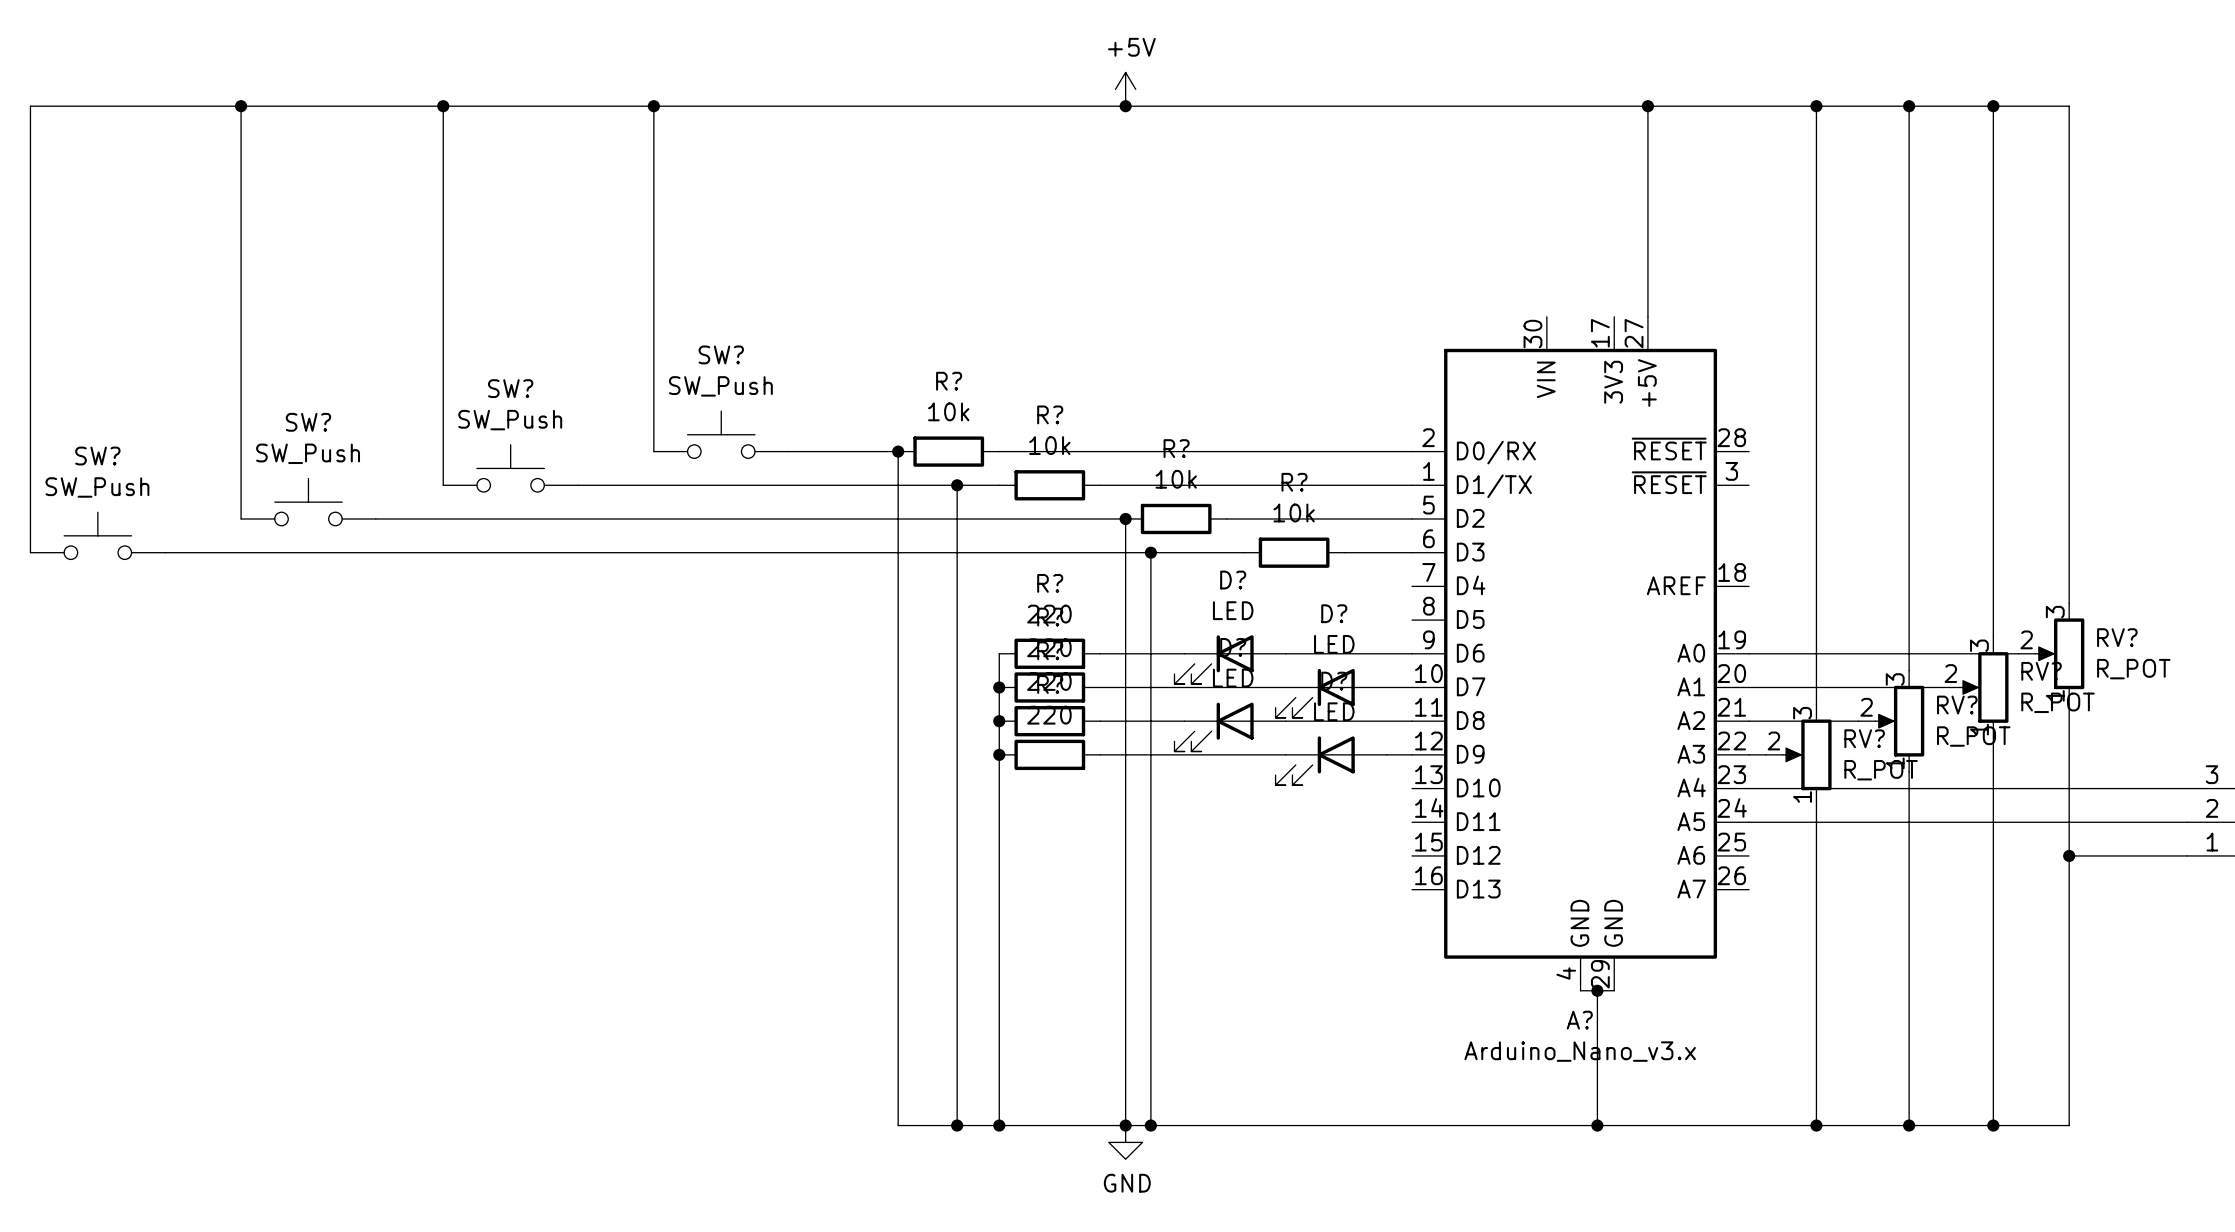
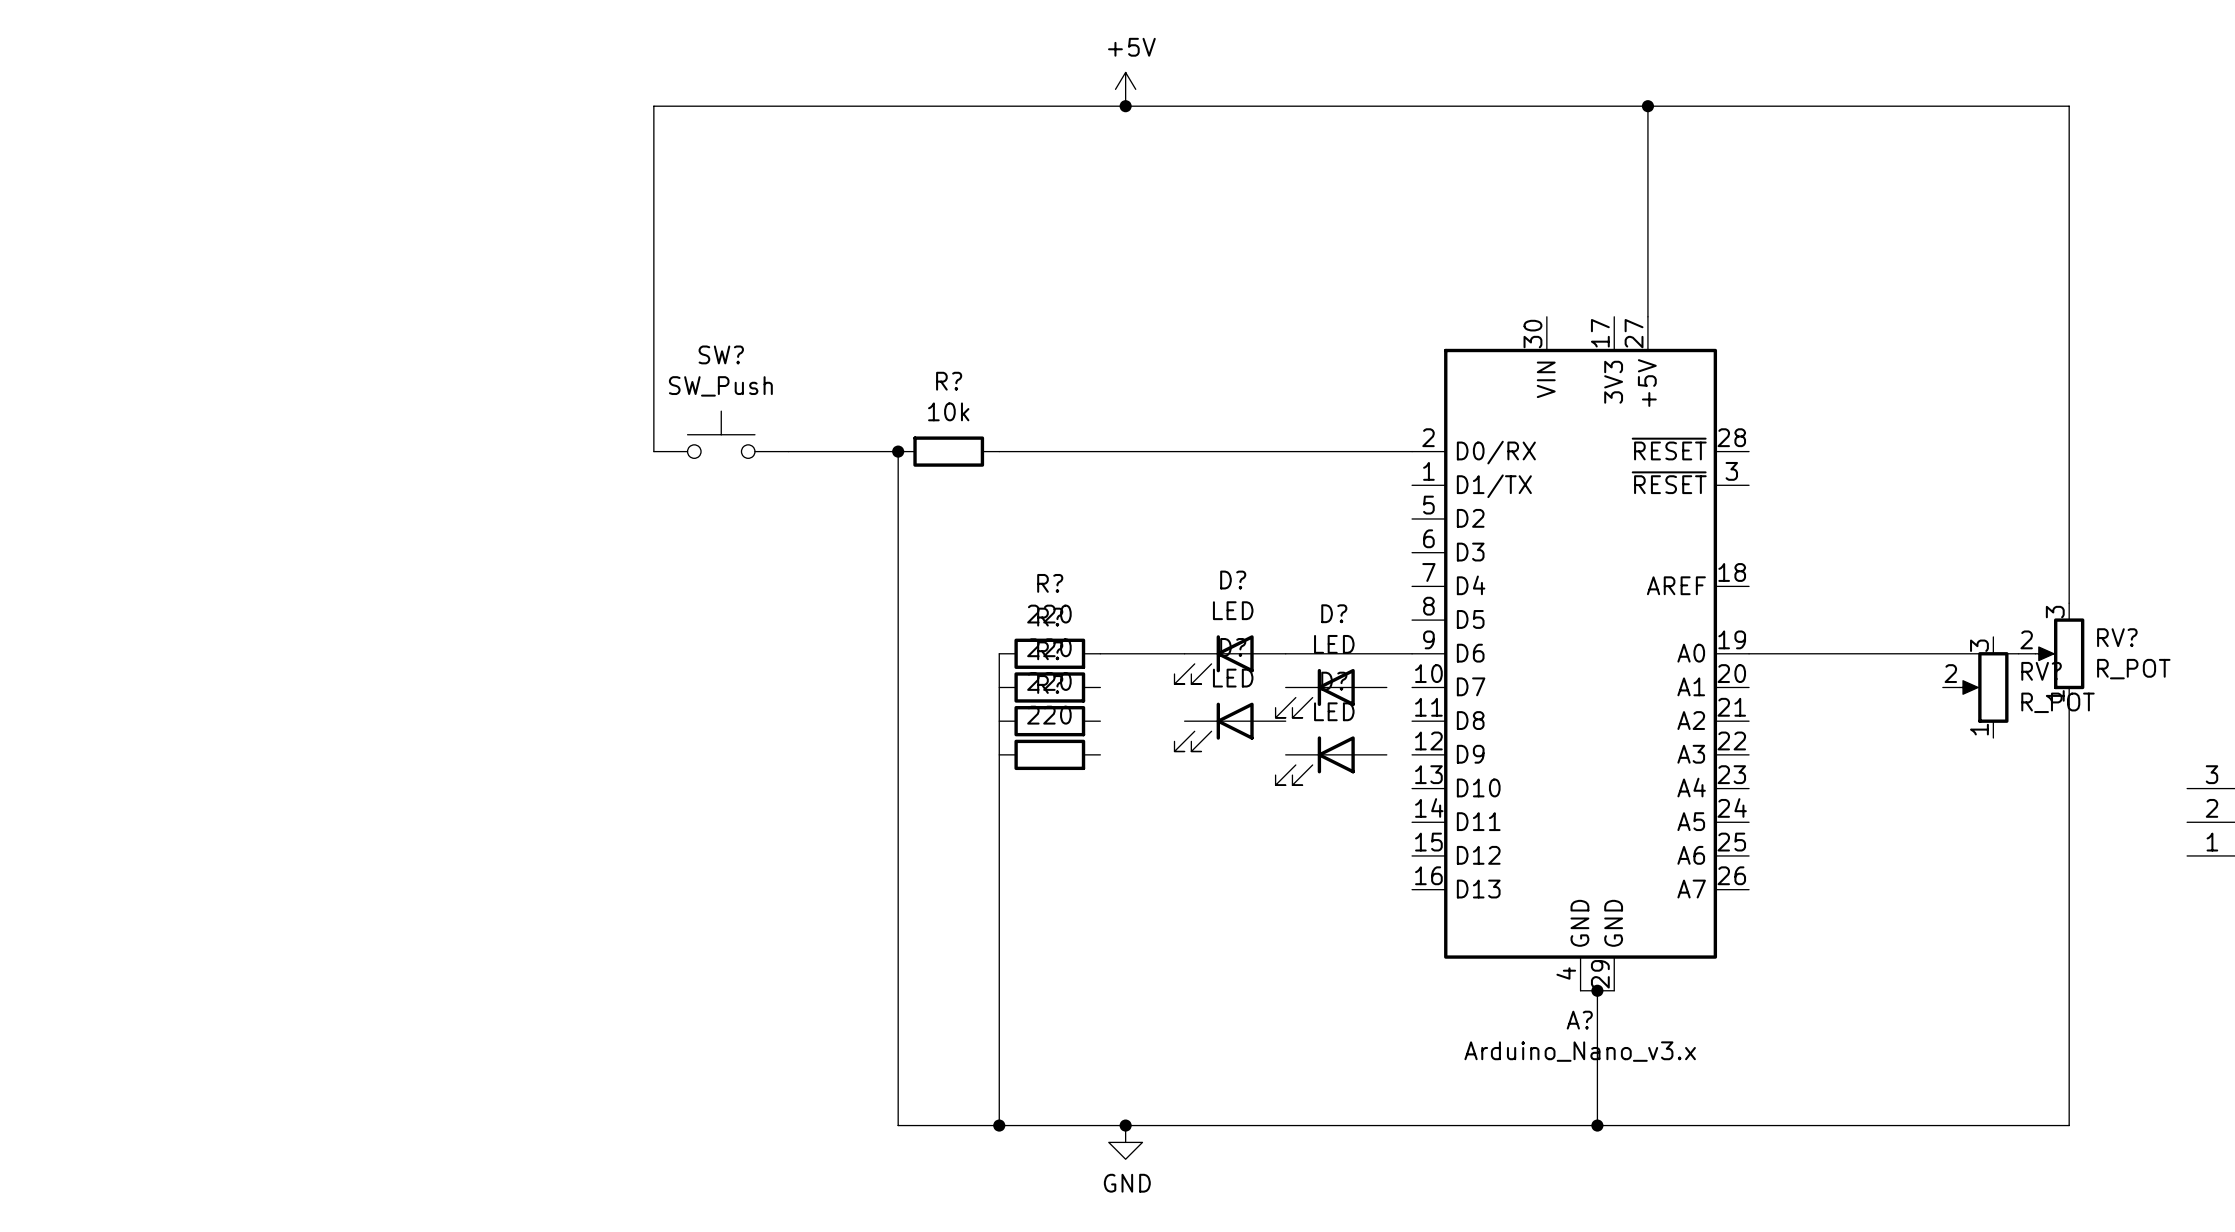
wire: (241, 106) (241, 518) -> none
junction: (241, 106) -> none
wire: (443, 106) (443, 485) -> none
junction: (443, 106) -> none
wire: (653, 106) (30, 106) (30, 552) -> none
junction: (653, 106) -> none
wire: (1816, 106) (1816, 704) -> none
junction: (1816, 106) -> none
wire: (1909, 106) (1909, 670) -> none
junction: (1909, 106) -> none
wire: (1993, 106) (1993, 636) -> none
junction: (1993, 106) -> none
SW?: SW_Push (510, 468) -> none
wire: (578, 485) (999, 485) -> none
wire: (957, 485) (957, 1125) -> none
junction: (957, 485) -> none
R?: 10k (1049, 485) -> none
wire: (1100, 485) (1412, 485) -> none
SW?: SW_Push (308, 502) -> none
wire: (375, 518) (1125, 518) (1125, 1125) -> none
junction: (1125, 518) -> none
R?: 10k (1176, 518) -> none
wire: (1226, 518) (1412, 518) -> none
SW?: SW_Push (97, 535) -> none
wire: (165, 552) (1243, 552) -> none
wire: (1150, 552) (1150, 1125) -> none
junction: (1150, 552) -> none
R?: 10k (1294, 552) -> none
wire: (1344, 552) (1412, 552) -> none
junction: (999, 687) -> none
wire: (1100, 687) (1285, 687) -> none
wire: (1386, 687) (1412, 687) -> none
wire: (1749, 687) (1942, 687) -> none
junction: (999, 721) -> none
wire: (1100, 721) (1184, 721) -> none
wire: (1285, 721) (1412, 721) -> none
wire: (1749, 721) (1858, 721) -> none
RV?: R_POT (1891, 721) -> none
wire: (1993, 738) (1993, 1125) -> none
junction: (999, 754) -> none
wire: (1100, 754) (1285, 754) -> none
wire: (1386, 754) (1412, 754) -> none
wire: (1749, 754) (1765, 754) -> none
RV?: R_POT (1798, 754) -> none
wire: (1909, 771) (1909, 1125) -> none
wire: (1749, 788) (2187, 788) -> none
wire: (1816, 805) (1816, 1125) -> none
wire: (1749, 822) (2187, 822) -> none
wire: (2069, 855) (2187, 855) -> none
junction: (2069, 855) -> none
junction: (957, 1125) -> none
junction: (1150, 1125) -> none
junction: (1816, 1125) -> none
junction: (1909, 1125) -> none
junction: (1993, 1125) -> none

